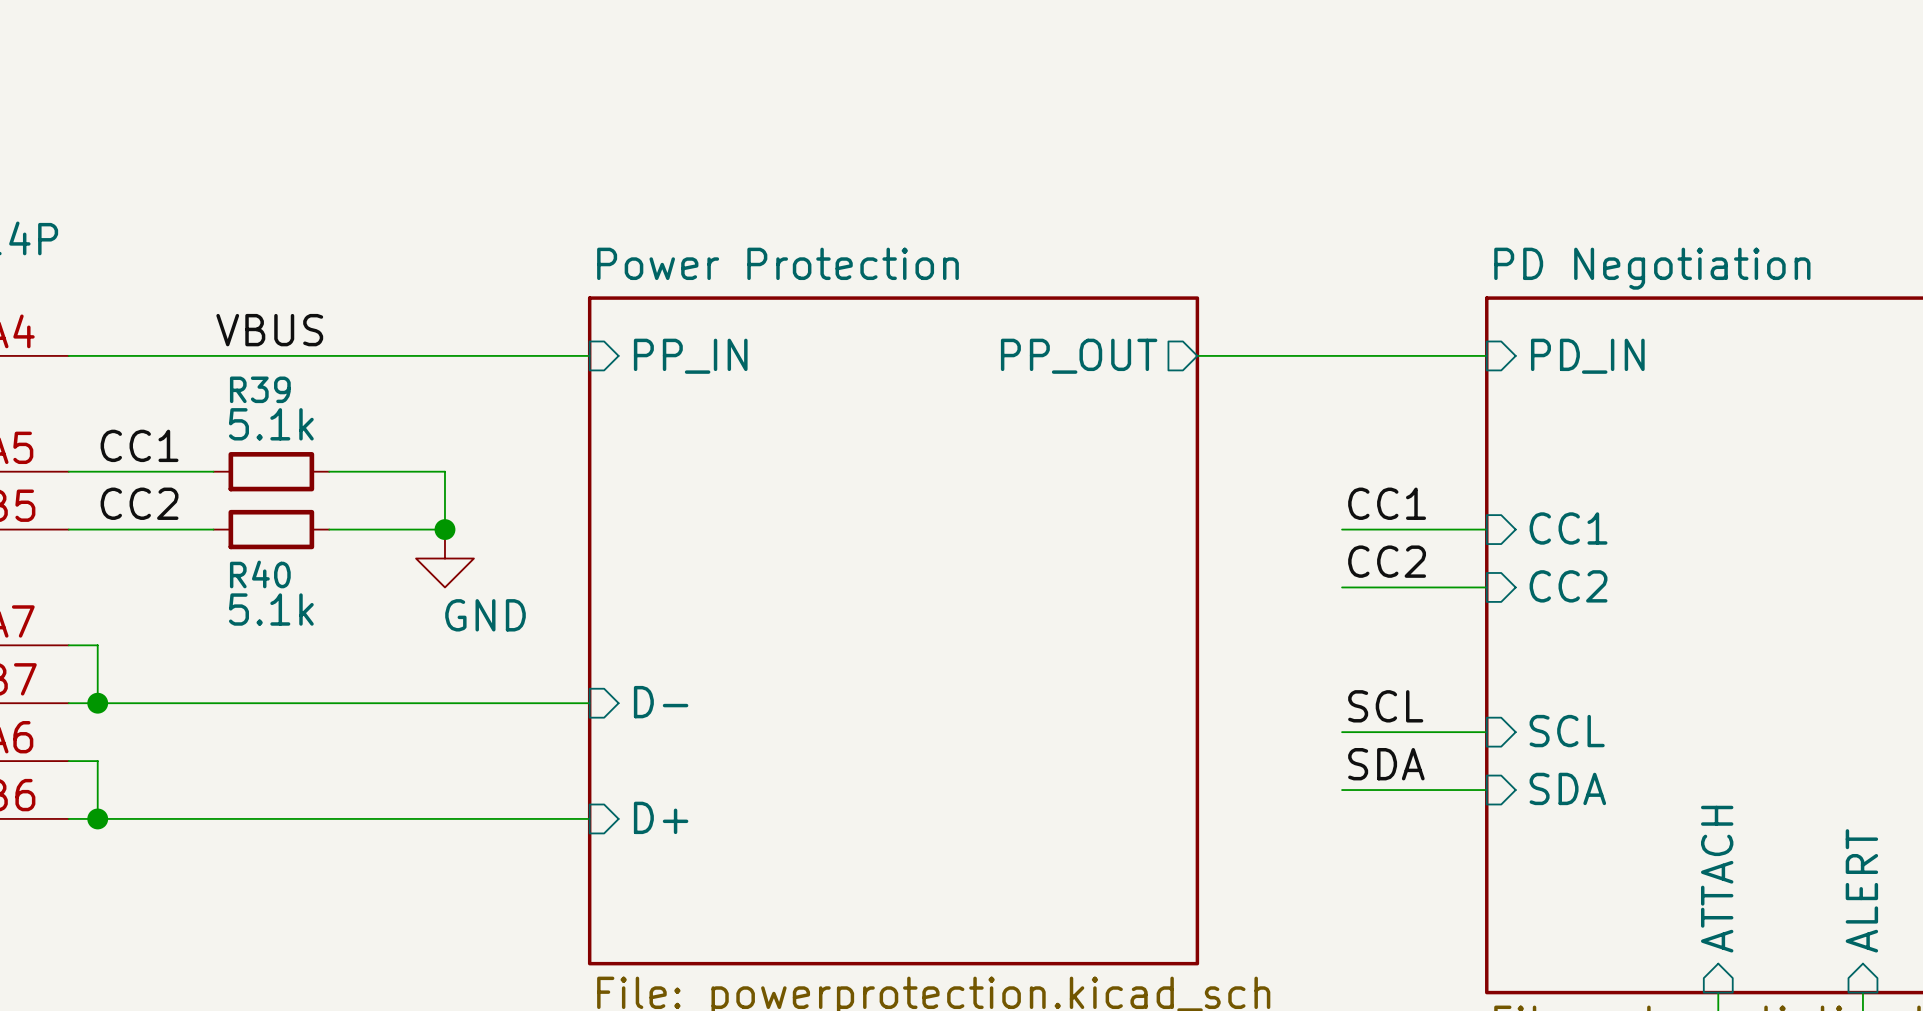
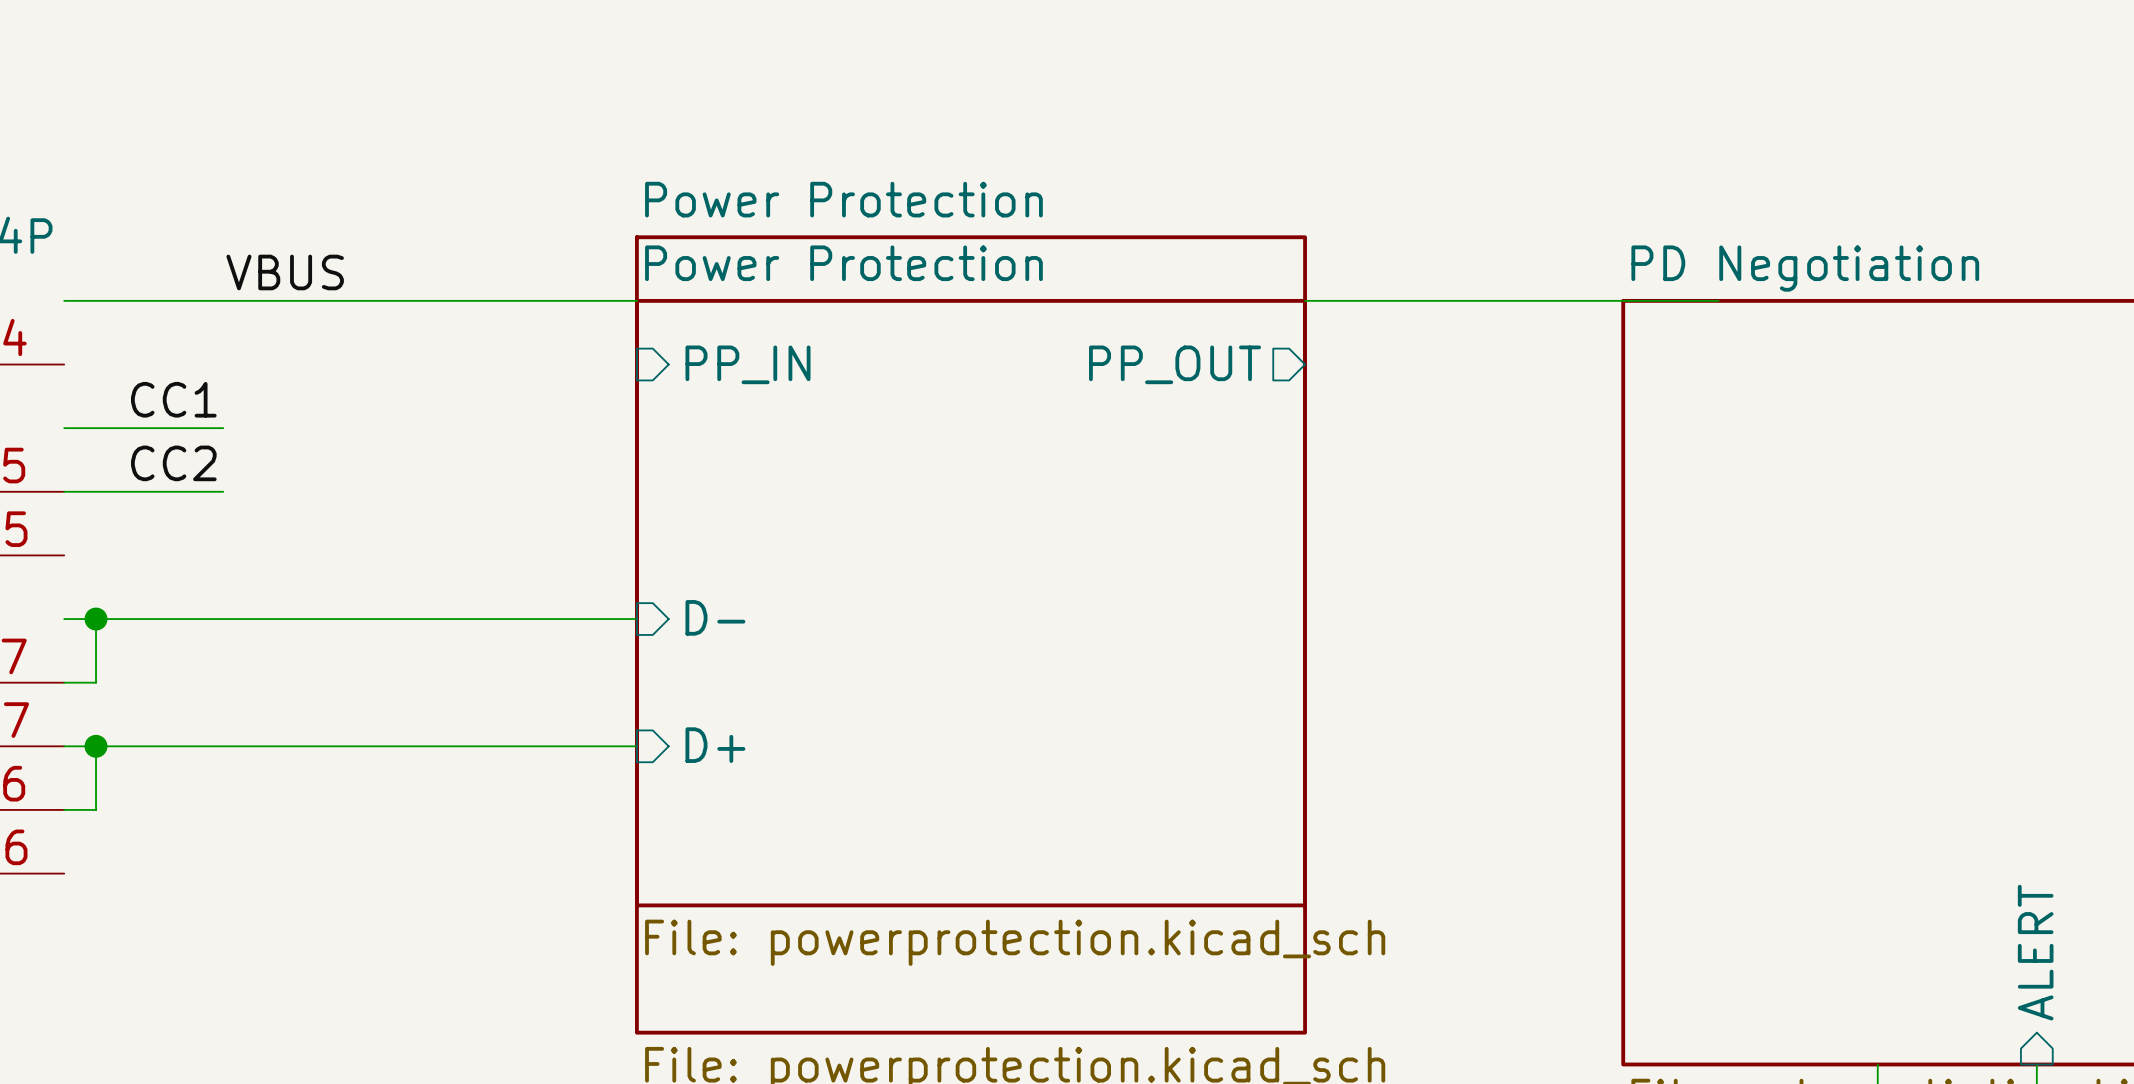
wire: none -> (1305, 300) (1718, 300)
label position: VBUS (269, 330) -> VBUS (285, 272)
wire: (68, 355) (589, 355) -> (64, 300) (636, 300)
wire: (1197, 355) (1486, 355) -> none
sheet pin: PD_IN (1587, 356) -> none
label position: CC1 (139, 445) -> CC1 (173, 399)
R39: 5.1k (271, 471) -> none
wire: (329, 471) (444, 471) (444, 529) (329, 529) -> none
label position: CC2 (139, 503) -> CC2 (173, 463)
label: CC1 (1387, 503) -> none
sheet pin: CC1 (1568, 528) -> none
wire: (68, 529) (213, 529) -> (64, 428) (223, 428)
R40: 5.1k (271, 529) -> none
junction: (444, 529) -> none
wire: (1342, 529) (1486, 529) -> none
sheet Power Protection: none -> File: powerprotection.kicad_sch (970, 571)
power symbol: GND (444, 558) -> none
label: CC2 (1387, 561) -> none
sheet pin: none -> D- (715, 617)
sheet pin: CC2 (1568, 586) -> none
junction: none -> (96, 619)
wire: (1342, 587) (1486, 587) -> none
wire: (97, 645) (97, 703) -> (96, 682) (96, 619)
sheet pin: D- (661, 702) -> D+ (715, 745)
label: SCL (1385, 706) -> none
sheet pin: SCL (1567, 731) -> none
wire: (1342, 732) (1486, 732) -> none
wire: (97, 761) (97, 818) -> (96, 809) (96, 746)
label: SDA (1386, 764) -> none
sheet pin: SDA (1567, 788) -> none
wire: (1342, 790) (1486, 790) -> none
sheet pin: D+ (661, 817) -> none
wire: (68, 818) (589, 818) -> (64, 619) (636, 619)
junction: (97, 818) -> none
sheet pin: ATTACH (1717, 879) -> none

